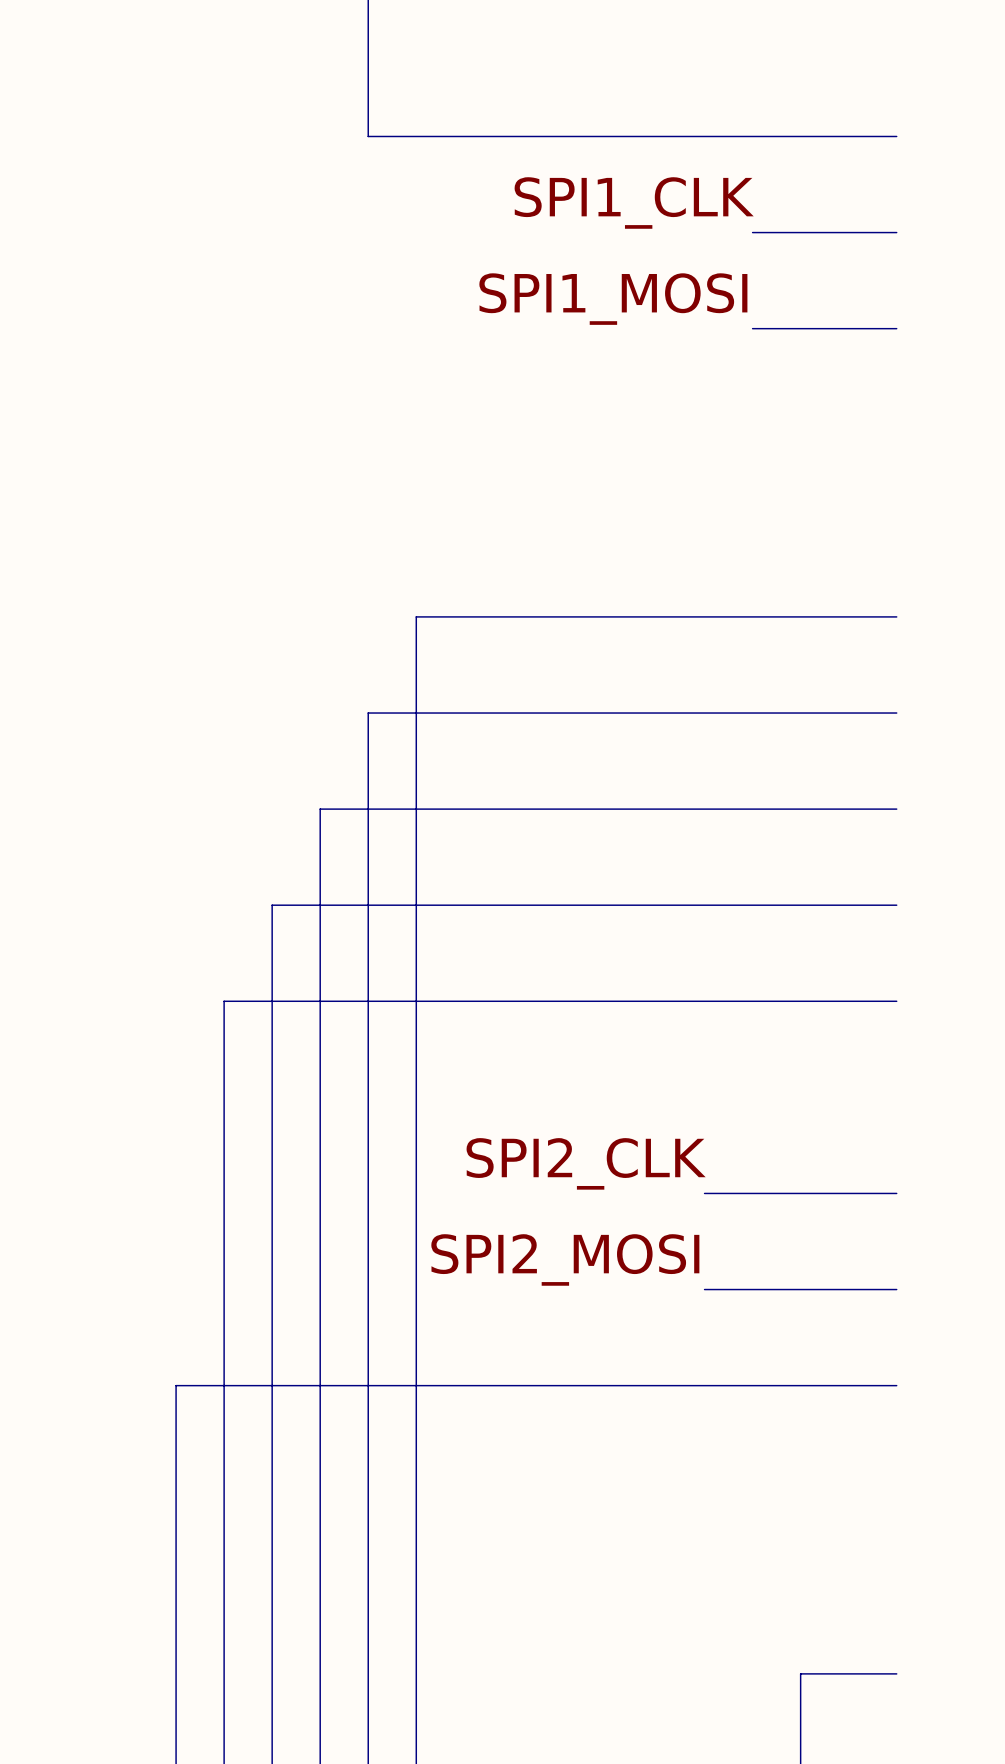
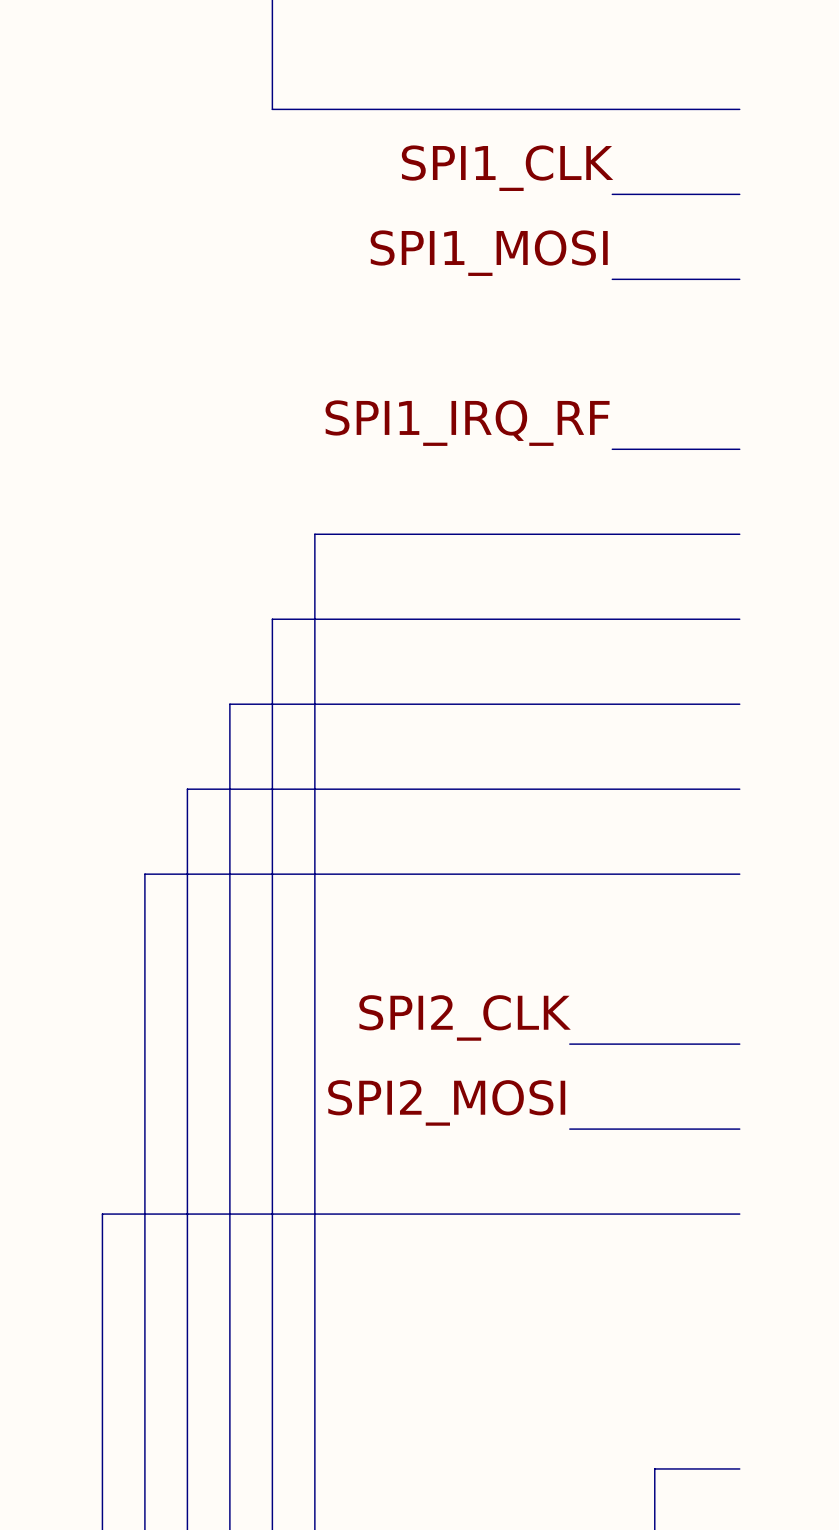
label: none -> SPI1_IRQ_RF (467, 423)
wire: none -> (612, 449) (739, 449)

